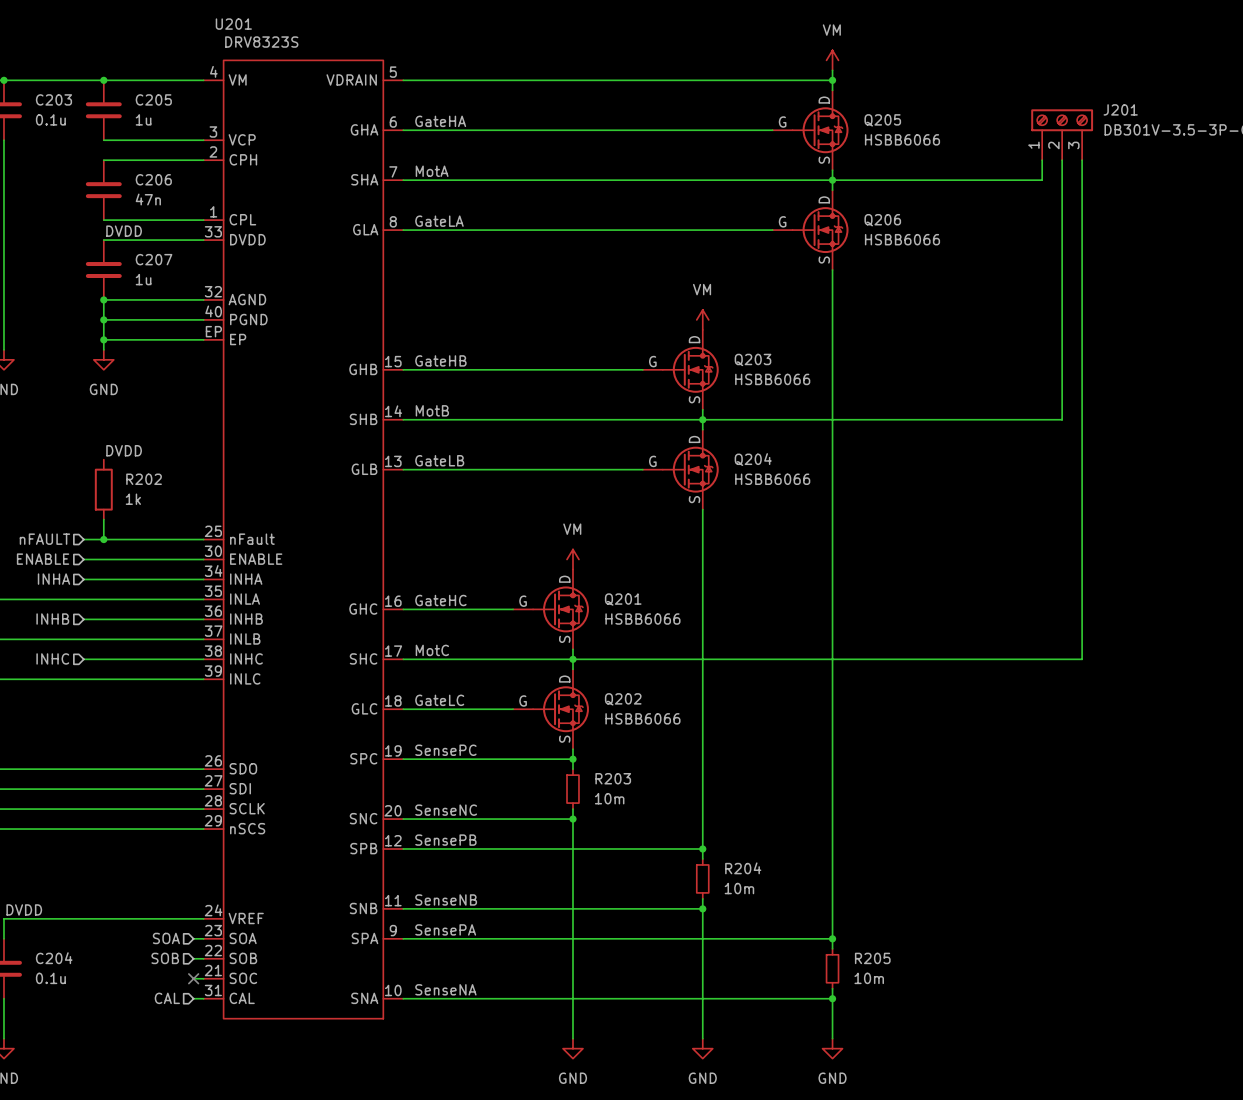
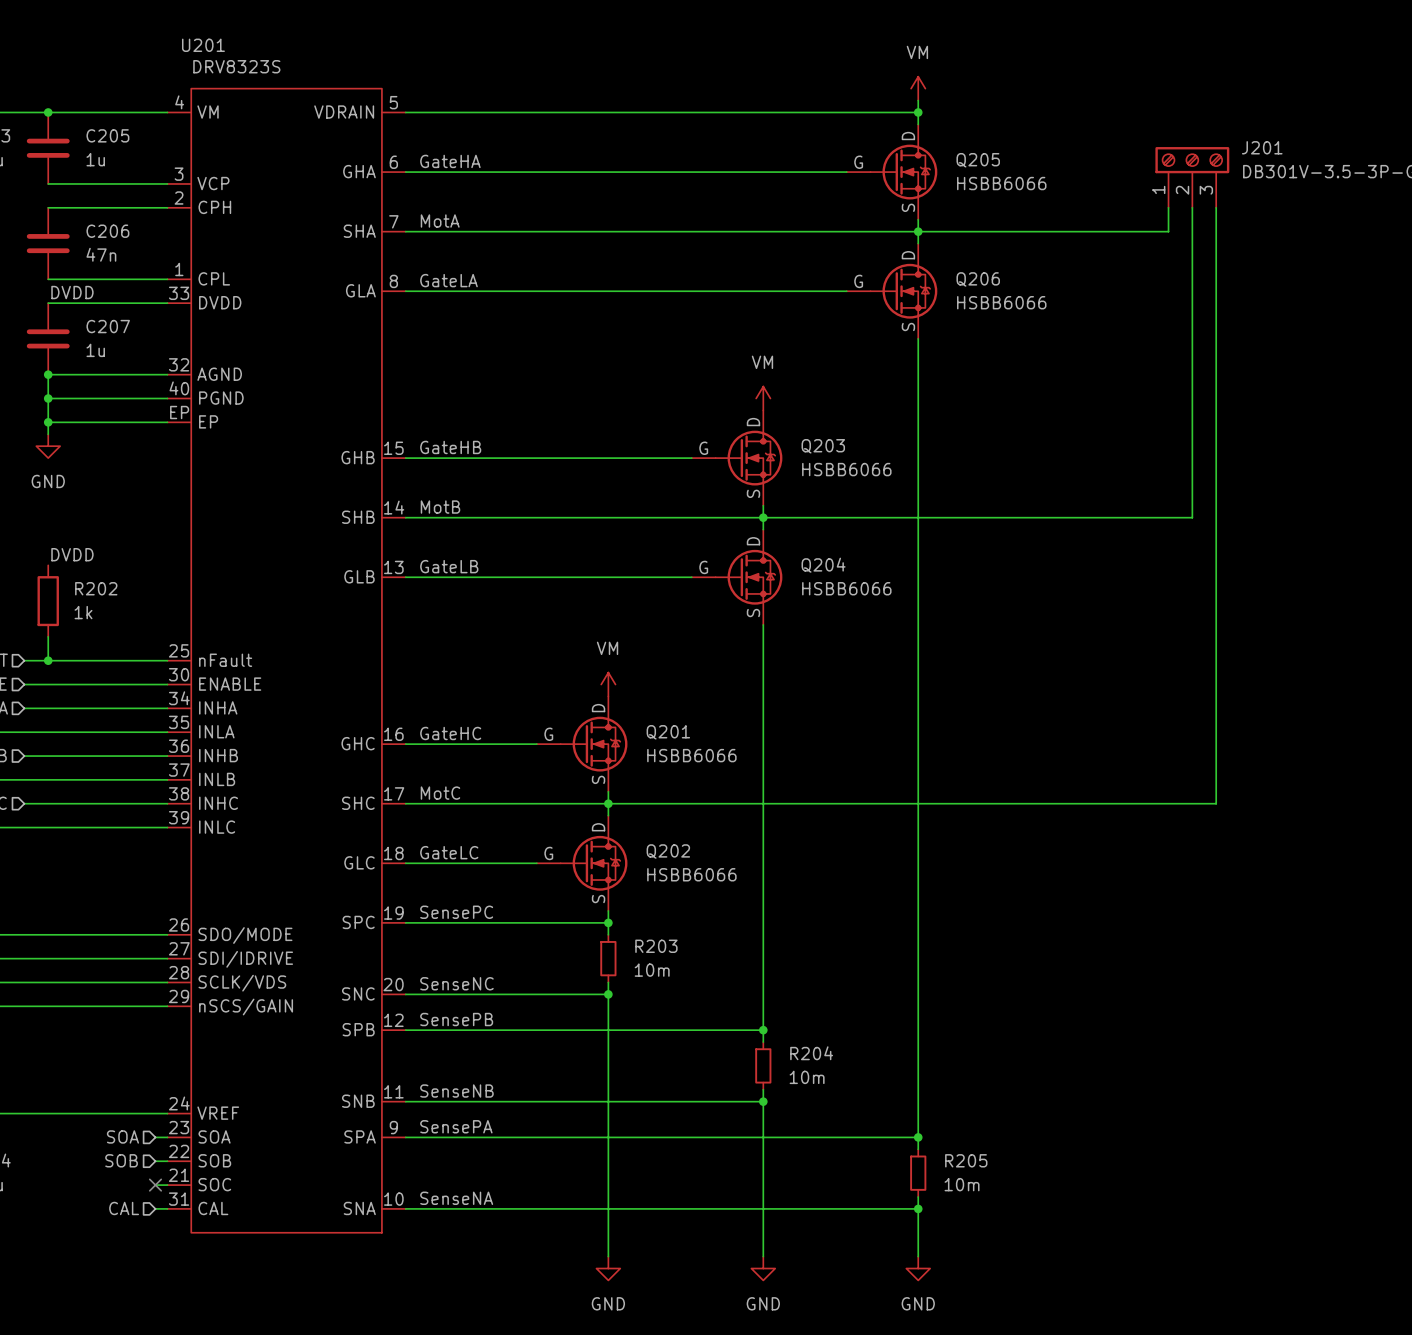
U201 pin name: SDO (243, 768) -> SDO/MODE (245, 935)
U201 pin name: SDI (240, 788) -> SDI/IDRIVE (245, 959)
U201 pin name: SCLK (247, 808) -> SCLK/VDS (242, 983)
U201 pin name: nSCS (247, 828) -> nSCS/GAIN (246, 1007)

